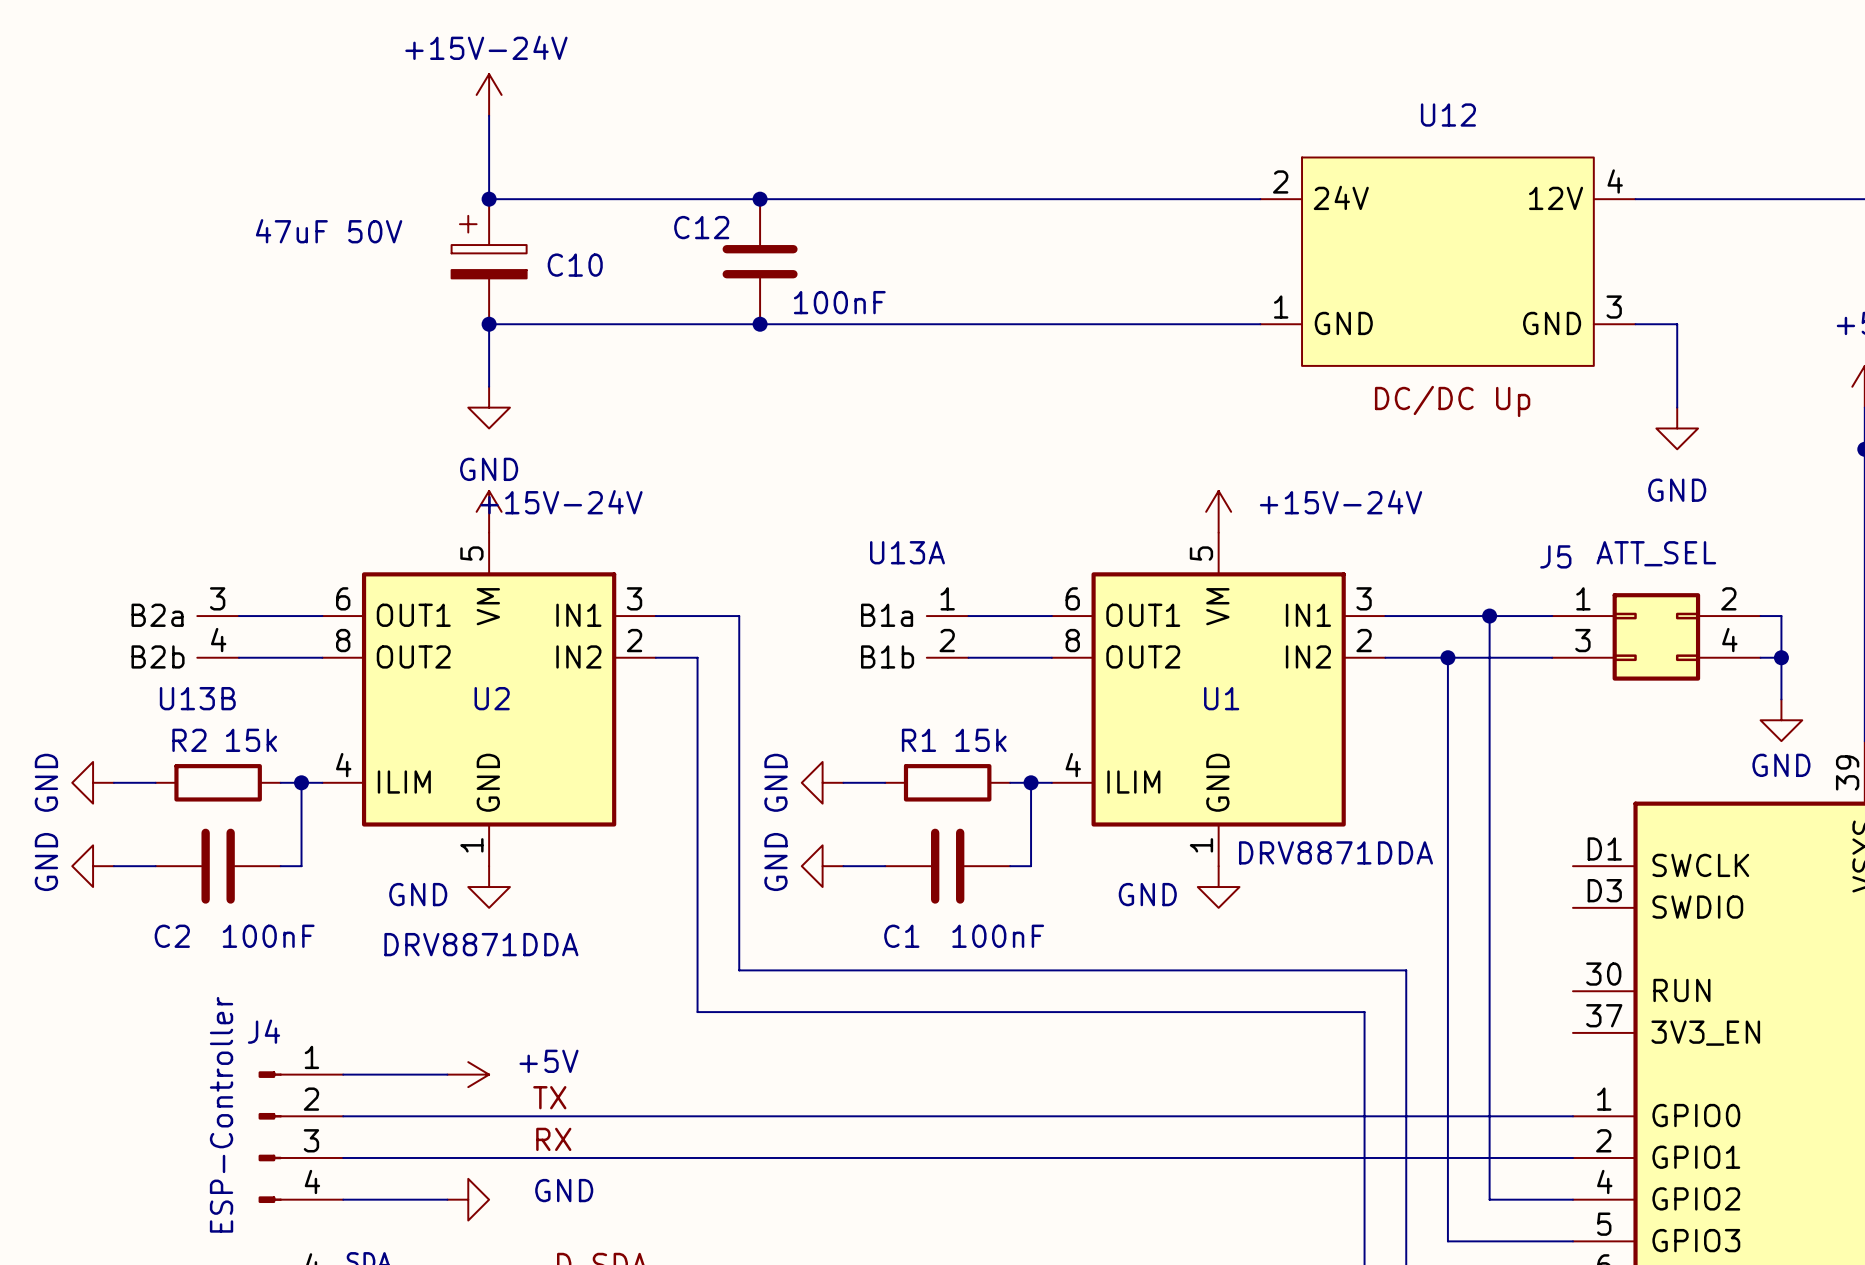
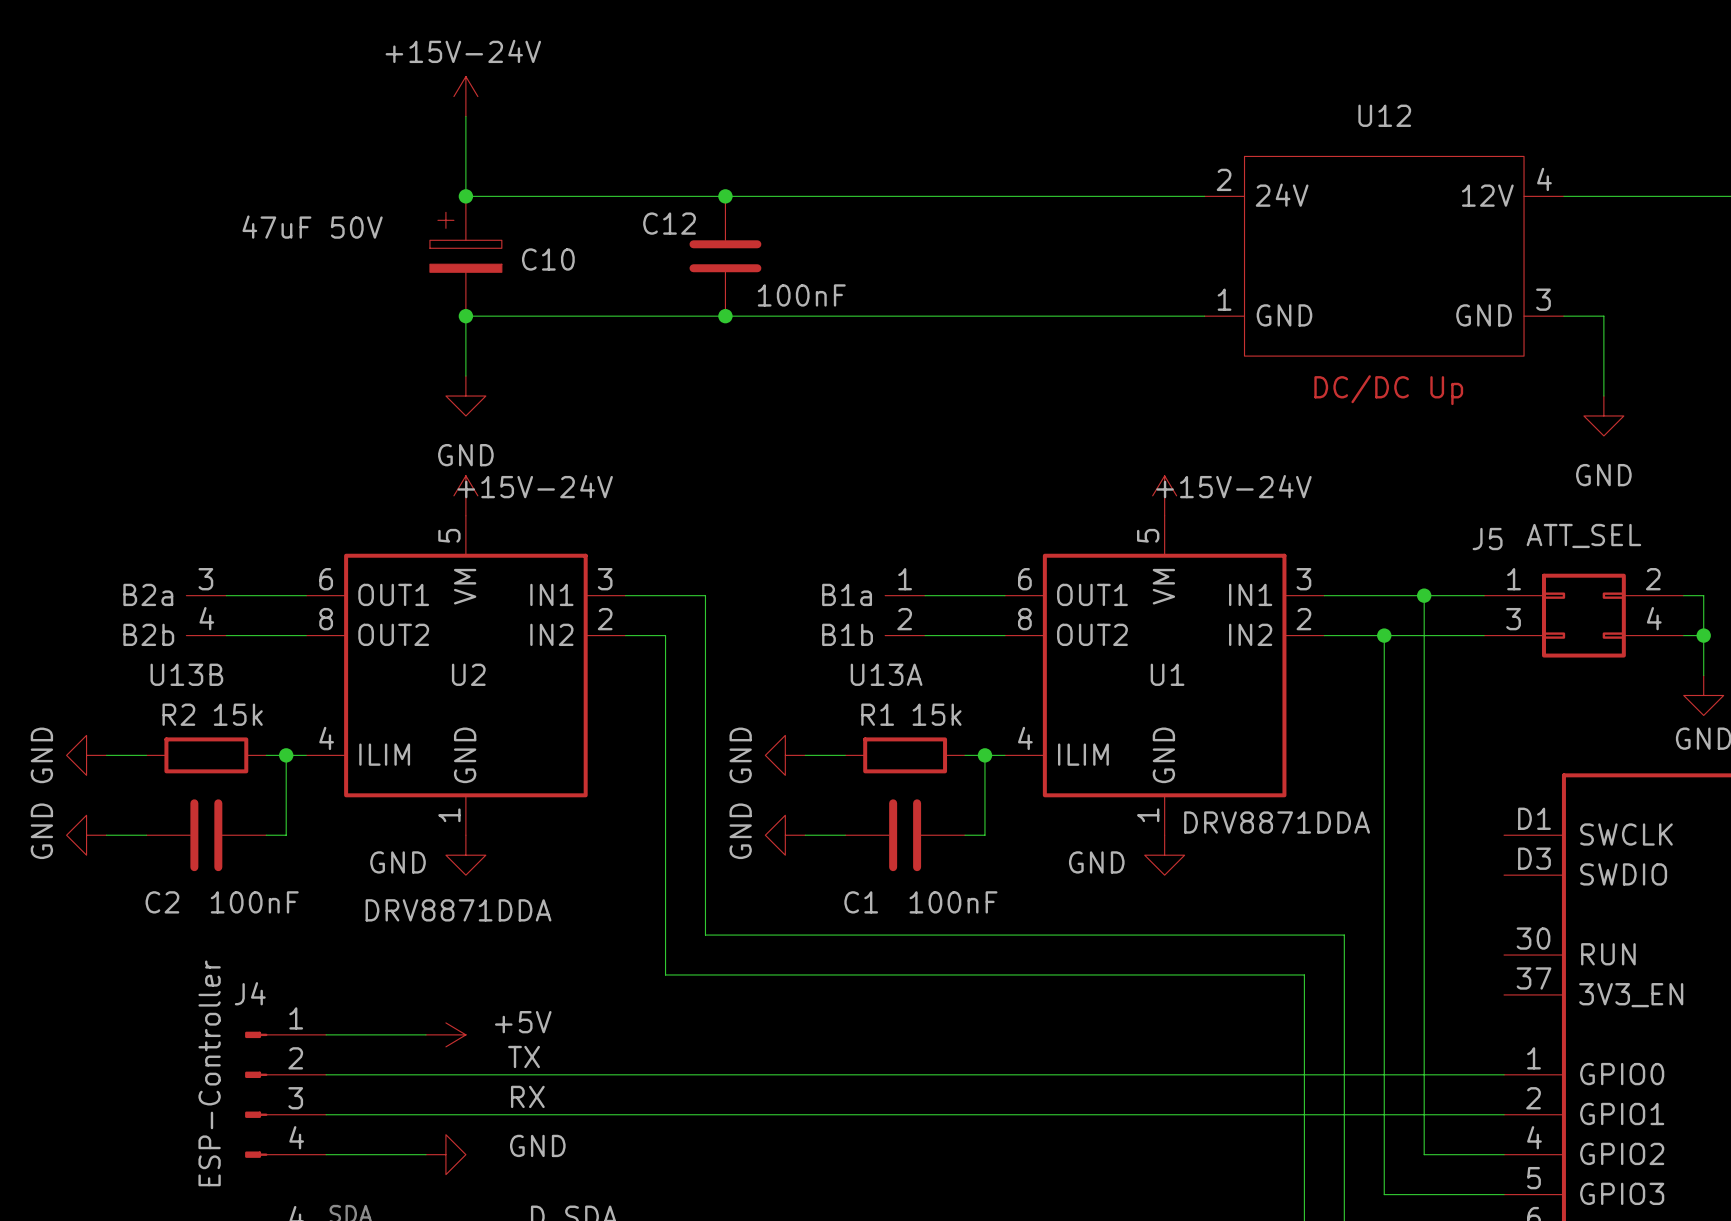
power symbol text position: +15V-24V (1341, 502) -> +15V-24V (1233, 486)
U13A name position: U13A (907, 552) -> U13A (886, 674)

